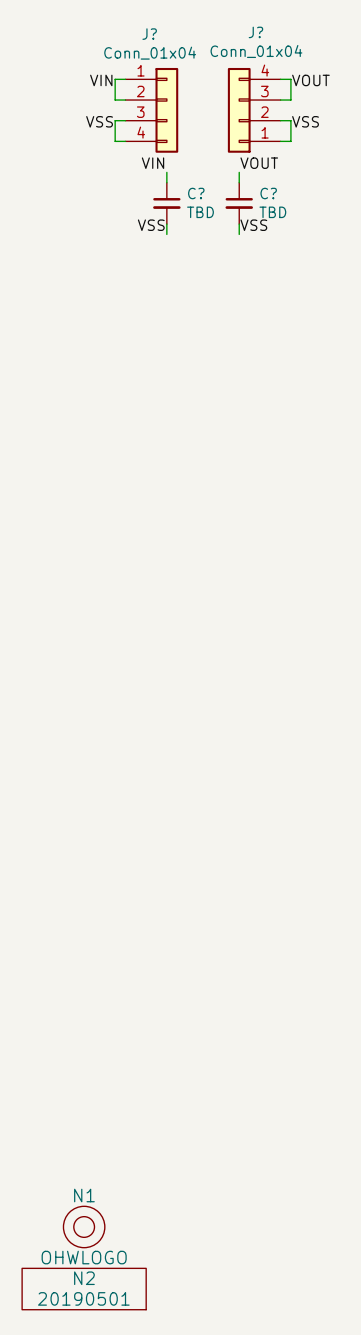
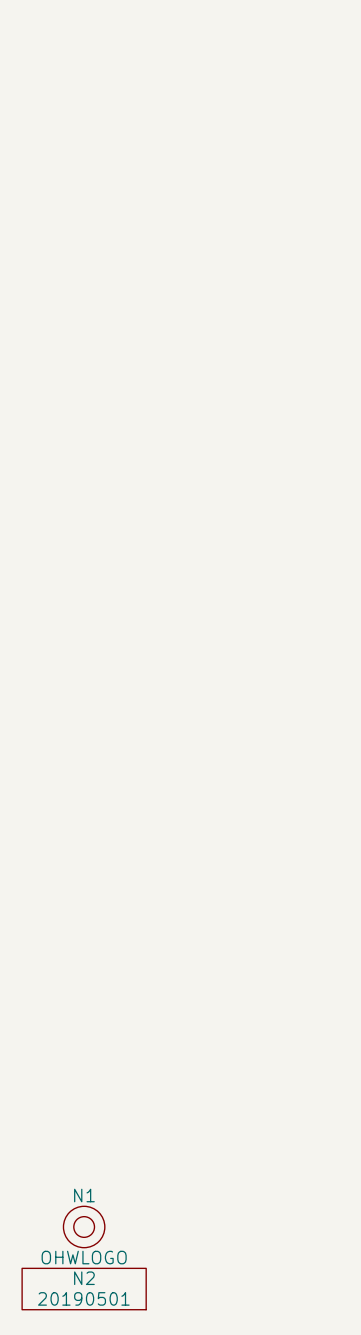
wire: (125, 79) (115, 79) (115, 100) (125, 100) -> none
wire: (280, 79) (290, 79) (290, 100) (280, 100) -> none
label: VIN (101, 80) -> none
label: VOUT (310, 80) -> none
J?: Conn_01x04 (151, 110) -> none
J?: Conn_01x04 (254, 110) -> none
wire: (125, 120) (115, 120) (115, 141) (125, 141) -> none
wire: (280, 120) (290, 120) (290, 141) (280, 141) -> none
label: VSS (99, 121) -> none
label: VSS (305, 121) -> none
label: VIN (152, 163) -> none
label: VOUT (259, 163) -> none
wire: (166, 172) (166, 182) -> none
wire: (239, 172) (239, 182) -> none
C?: TBD (166, 203) -> none
C?: TBD (239, 203) -> none
wire: (166, 224) (166, 234) -> none
wire: (239, 224) (239, 234) -> none
label: VSS (151, 225) -> none
label: VSS (253, 225) -> none

